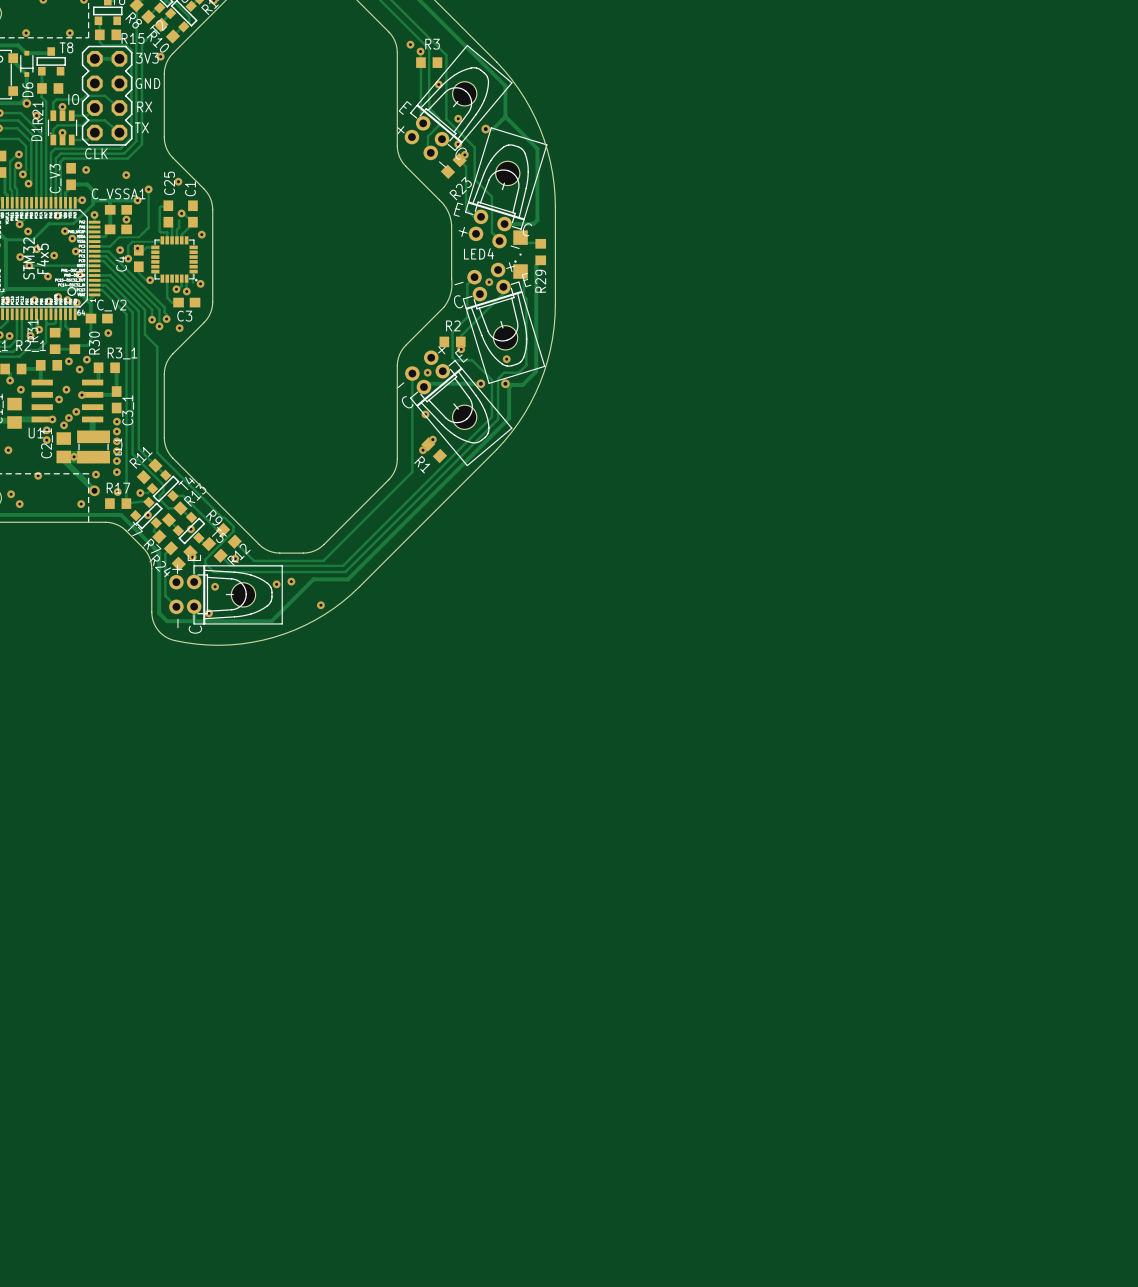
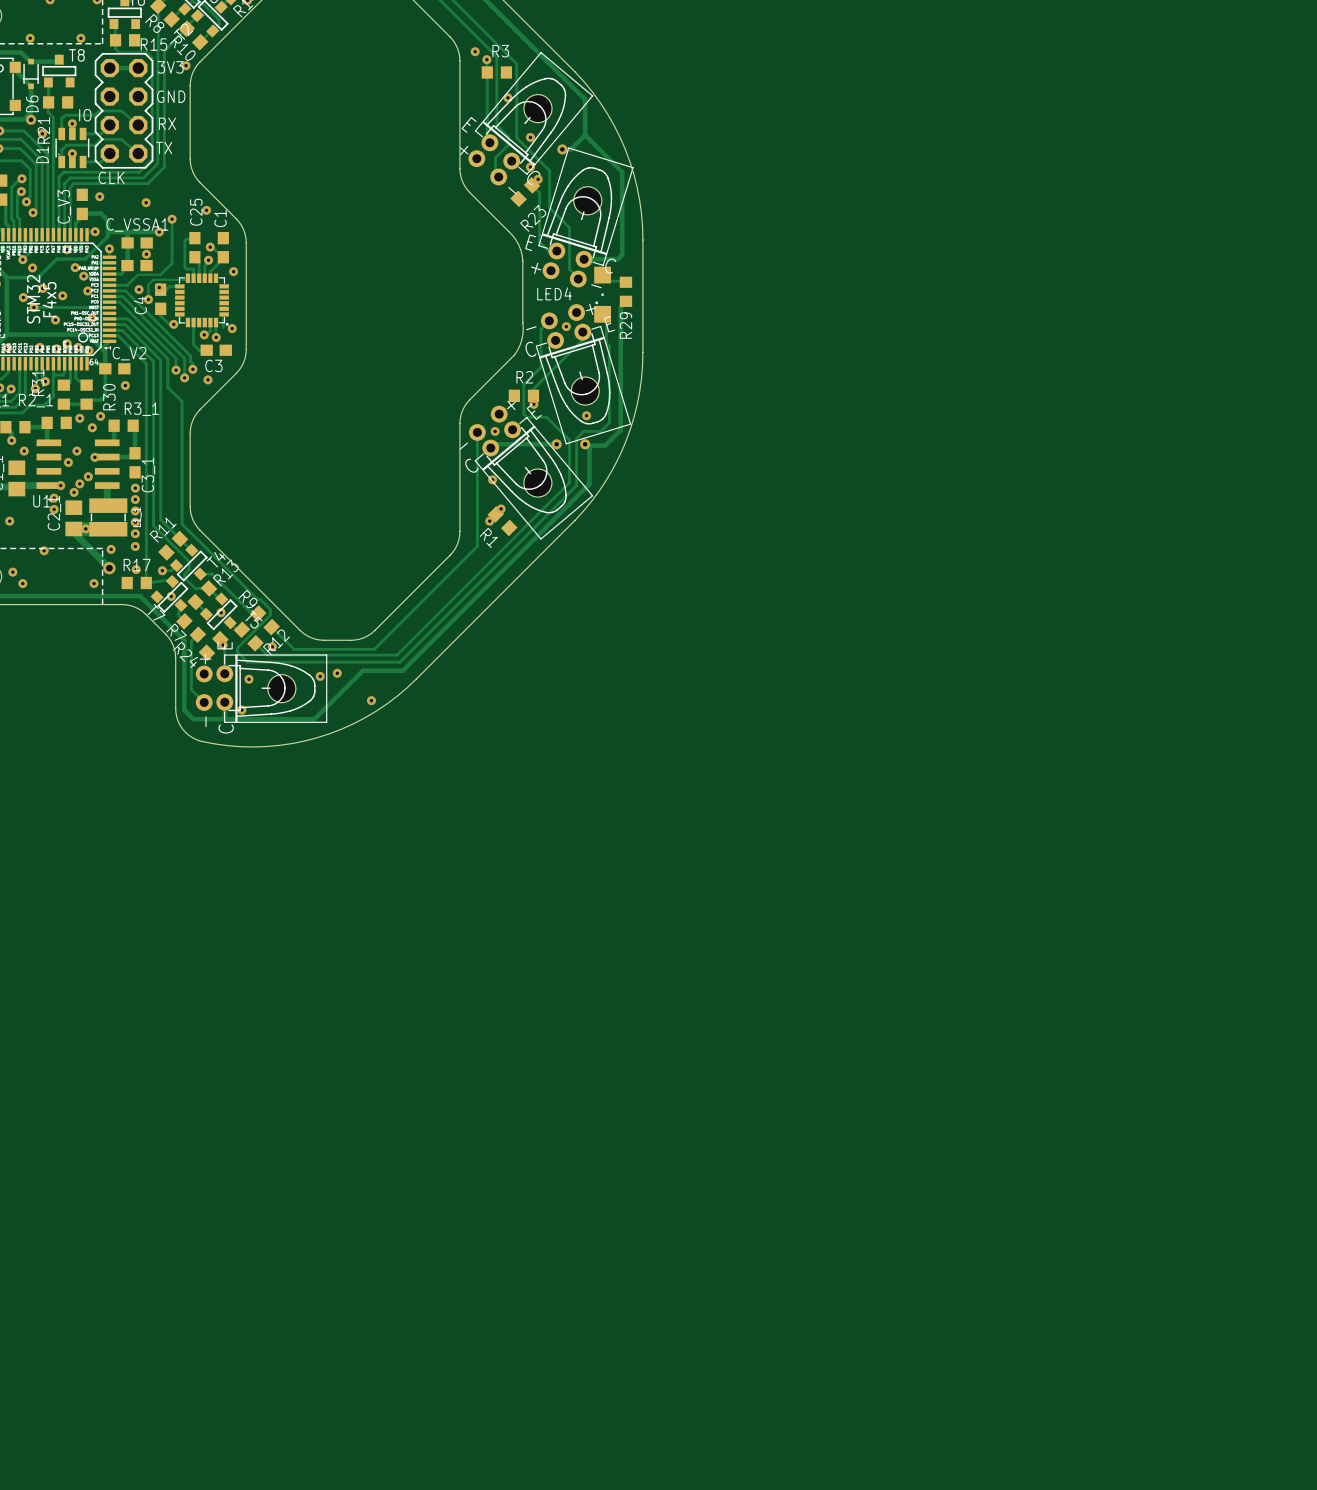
track: (179, 220) (179, 227) -> none
via: none -> (208, 260)

